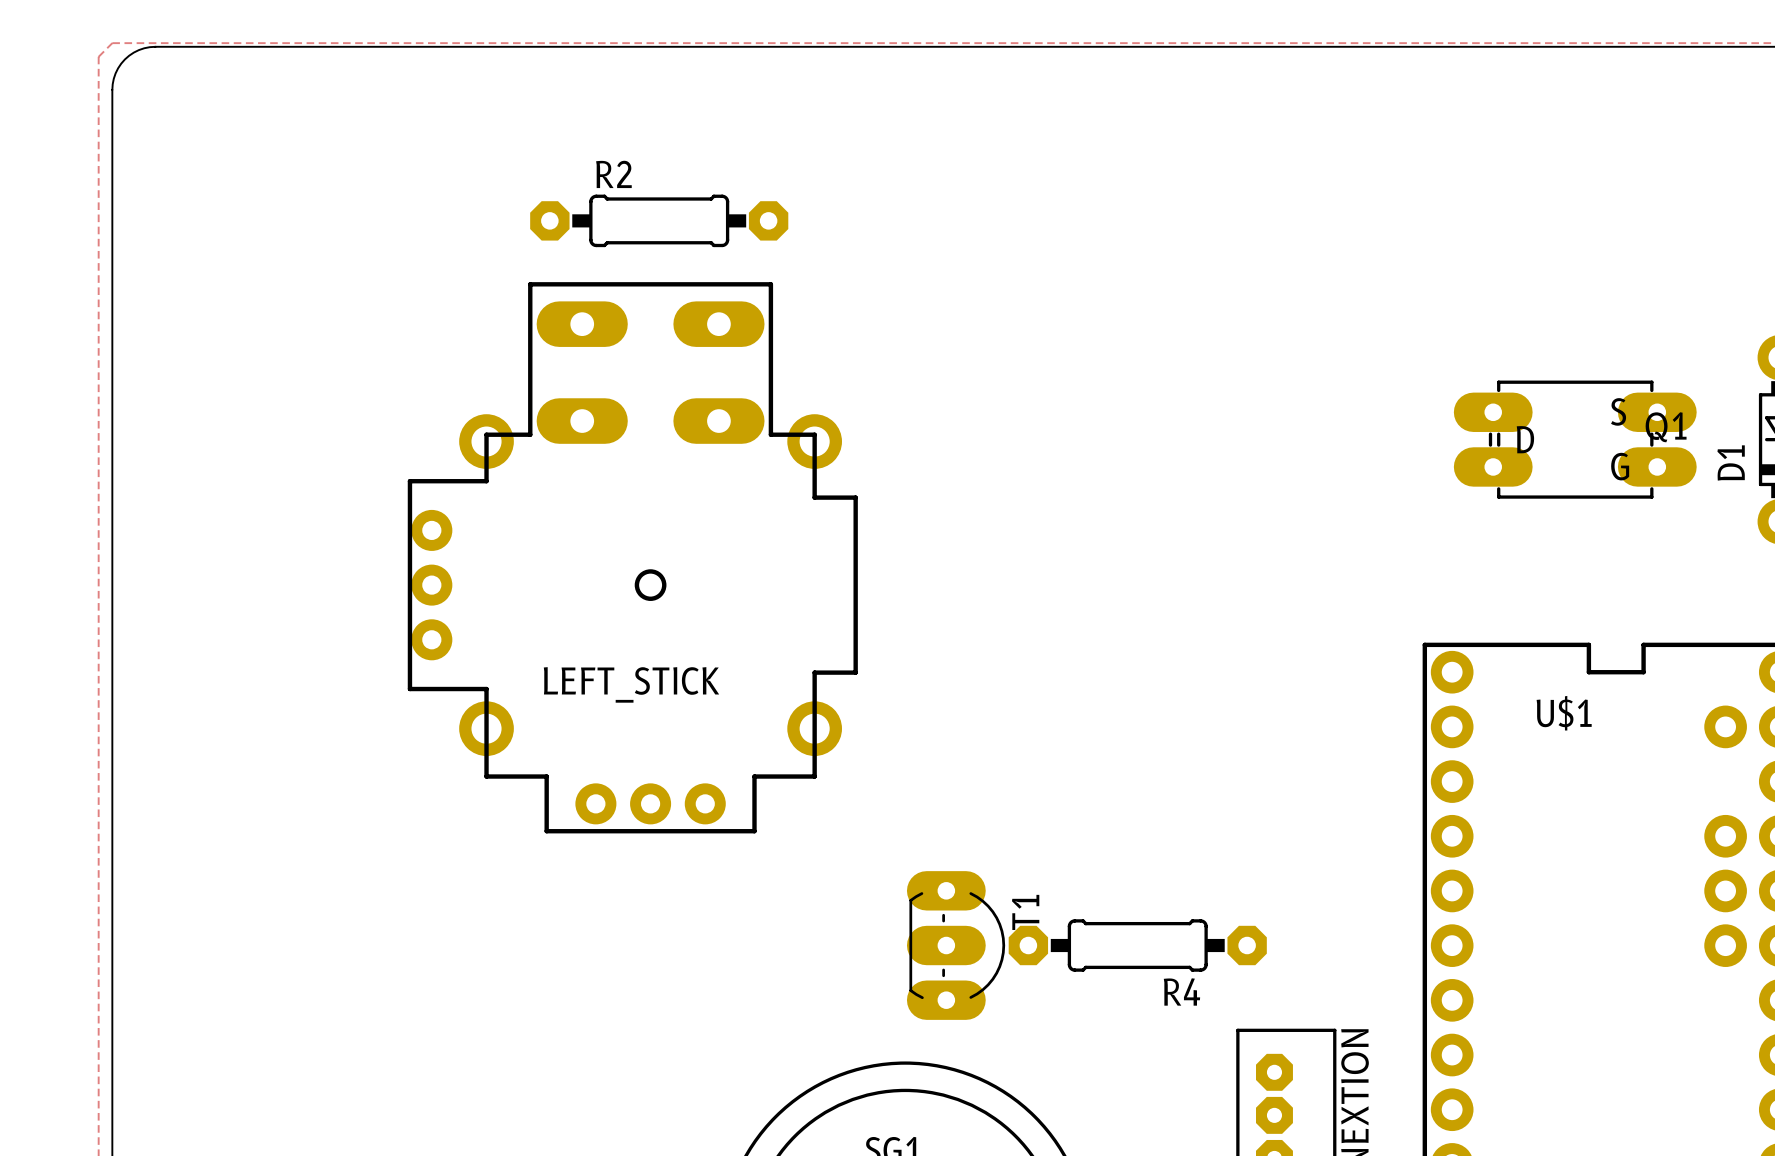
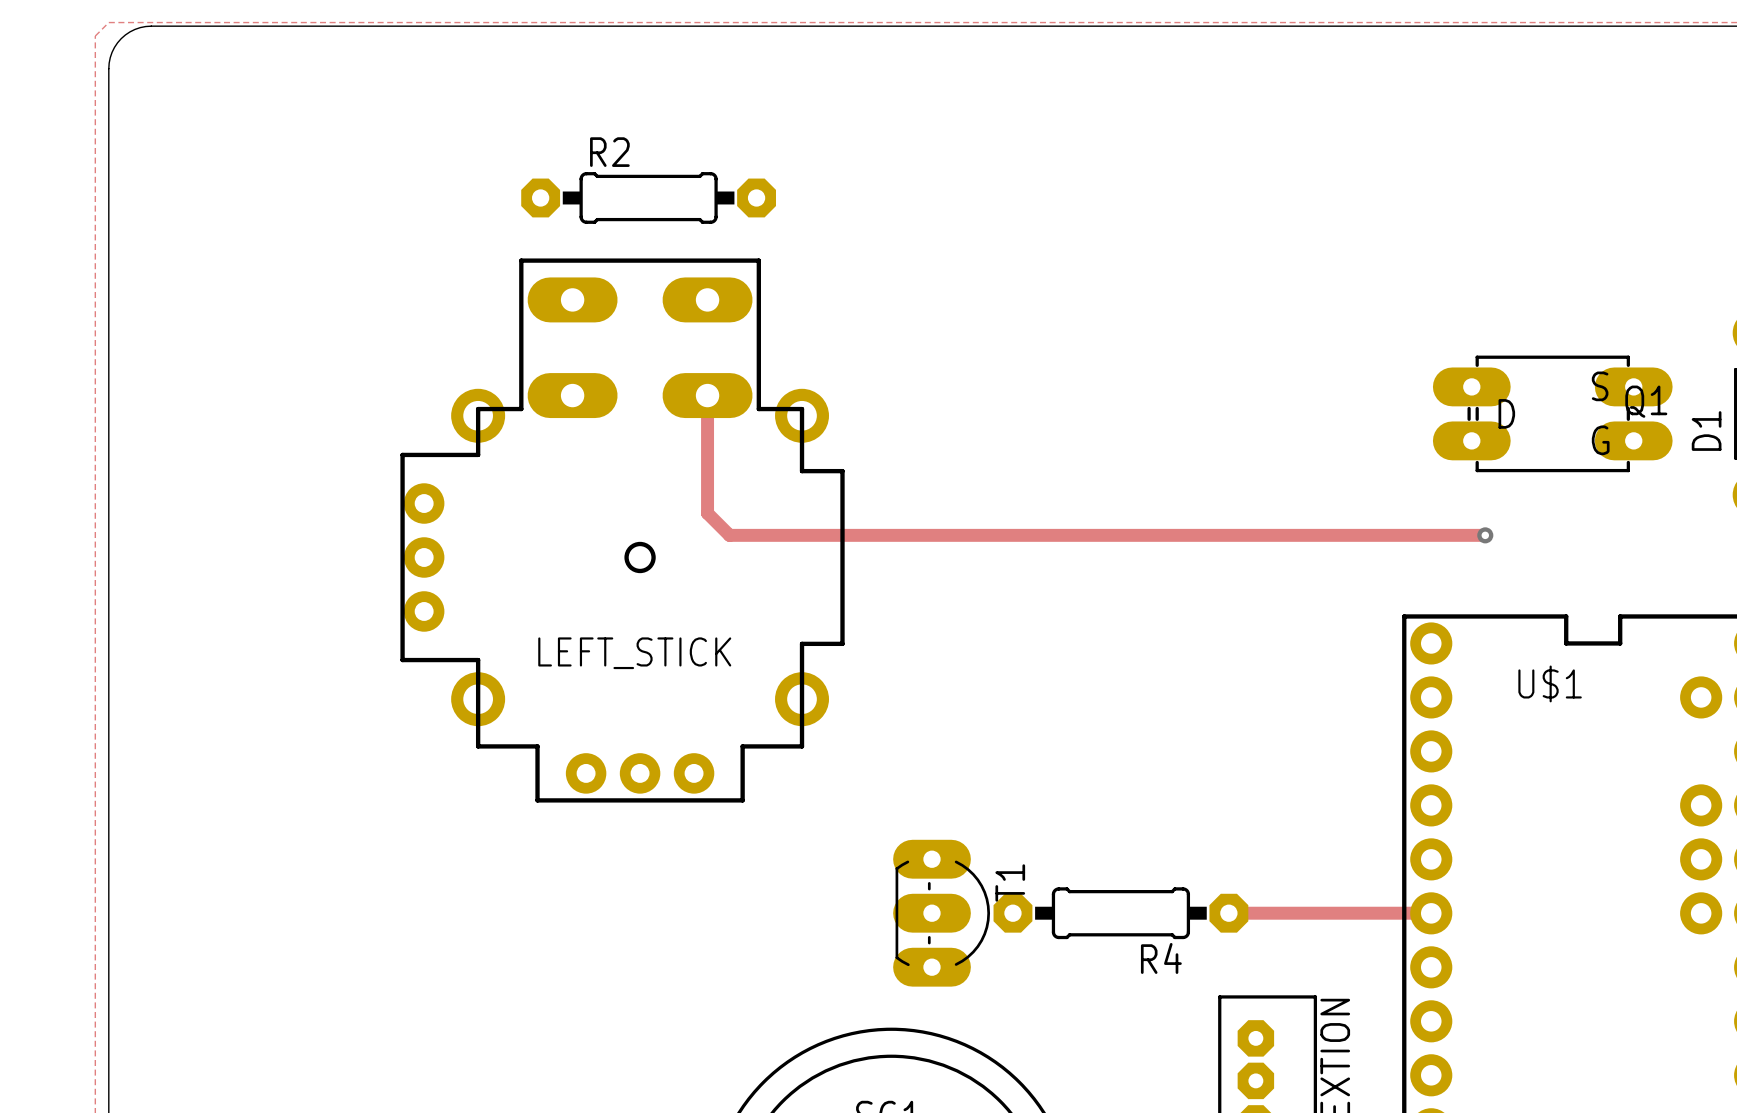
track: none -> (707, 395) (707, 513) (729, 535) (1485, 535)
via: none -> (1485, 535)
track: none -> (1228, 913) (1431, 913)

